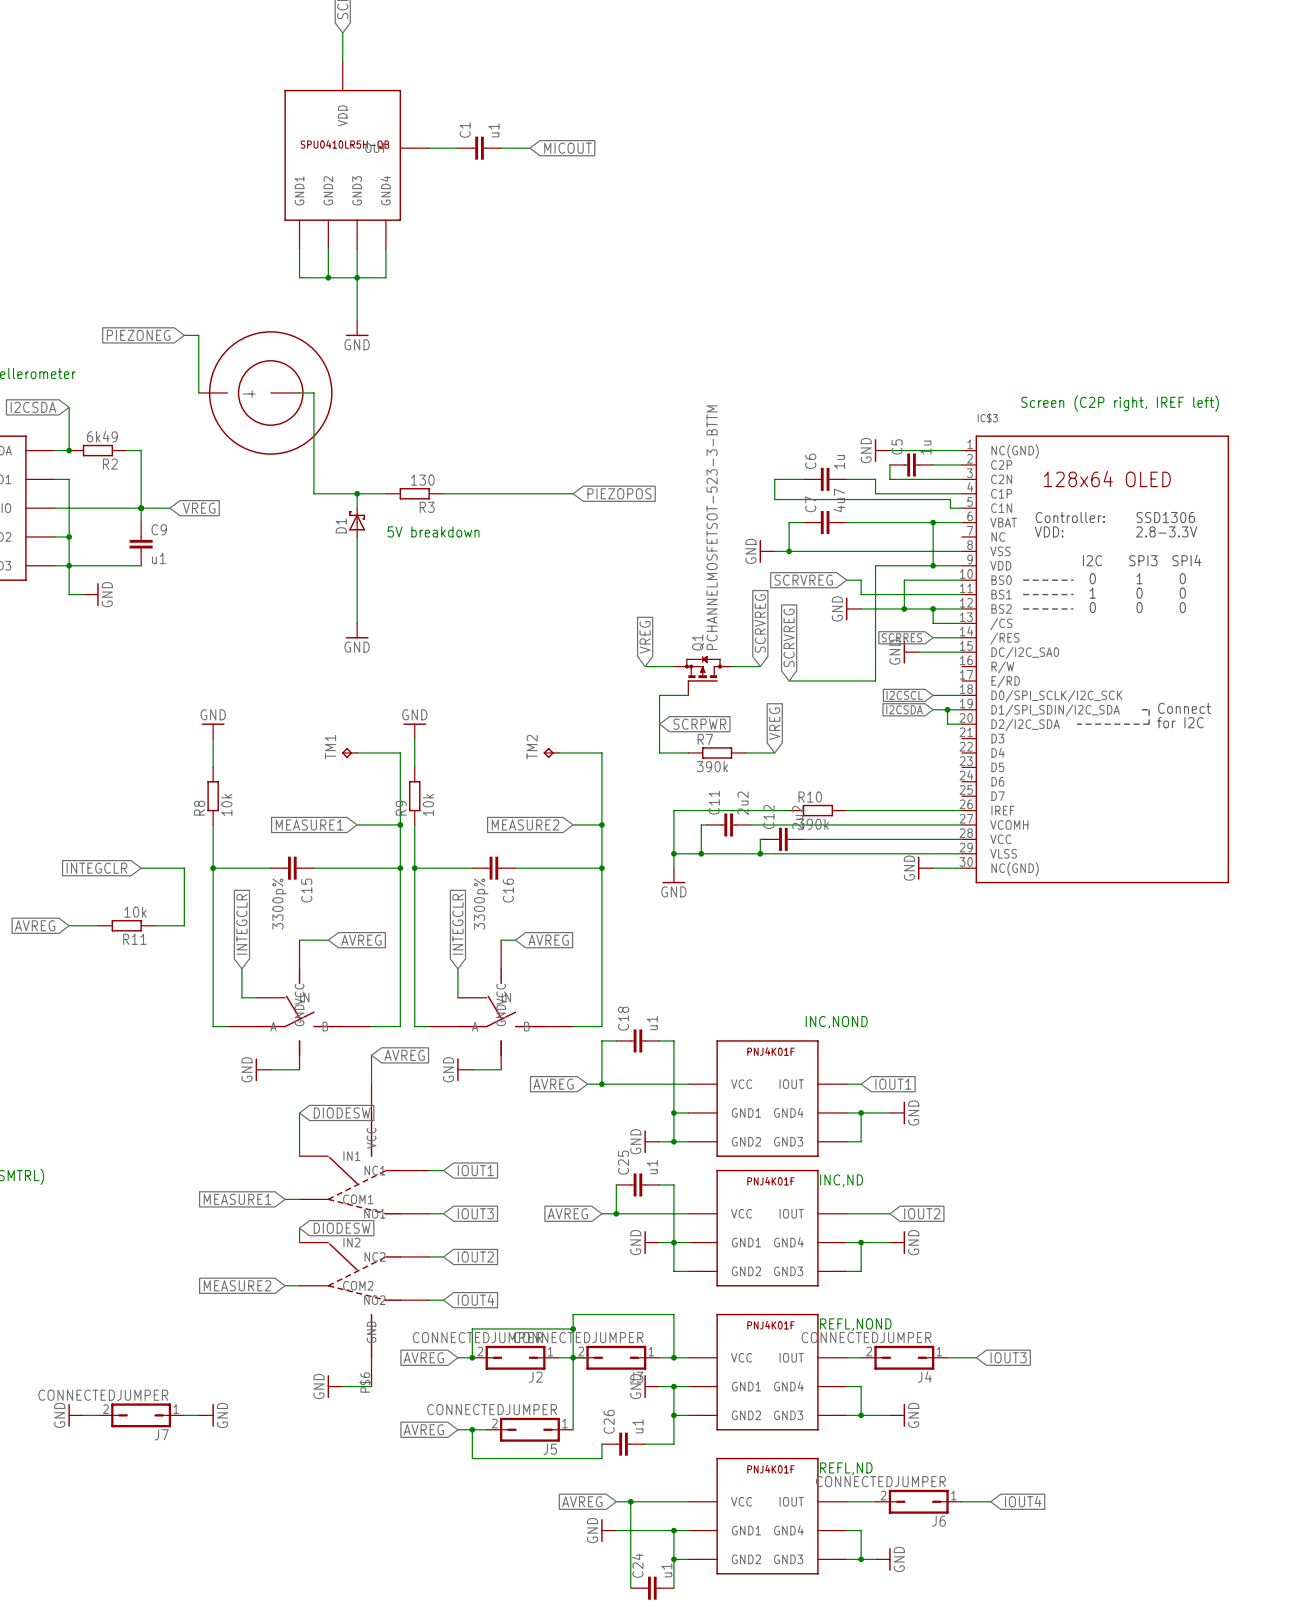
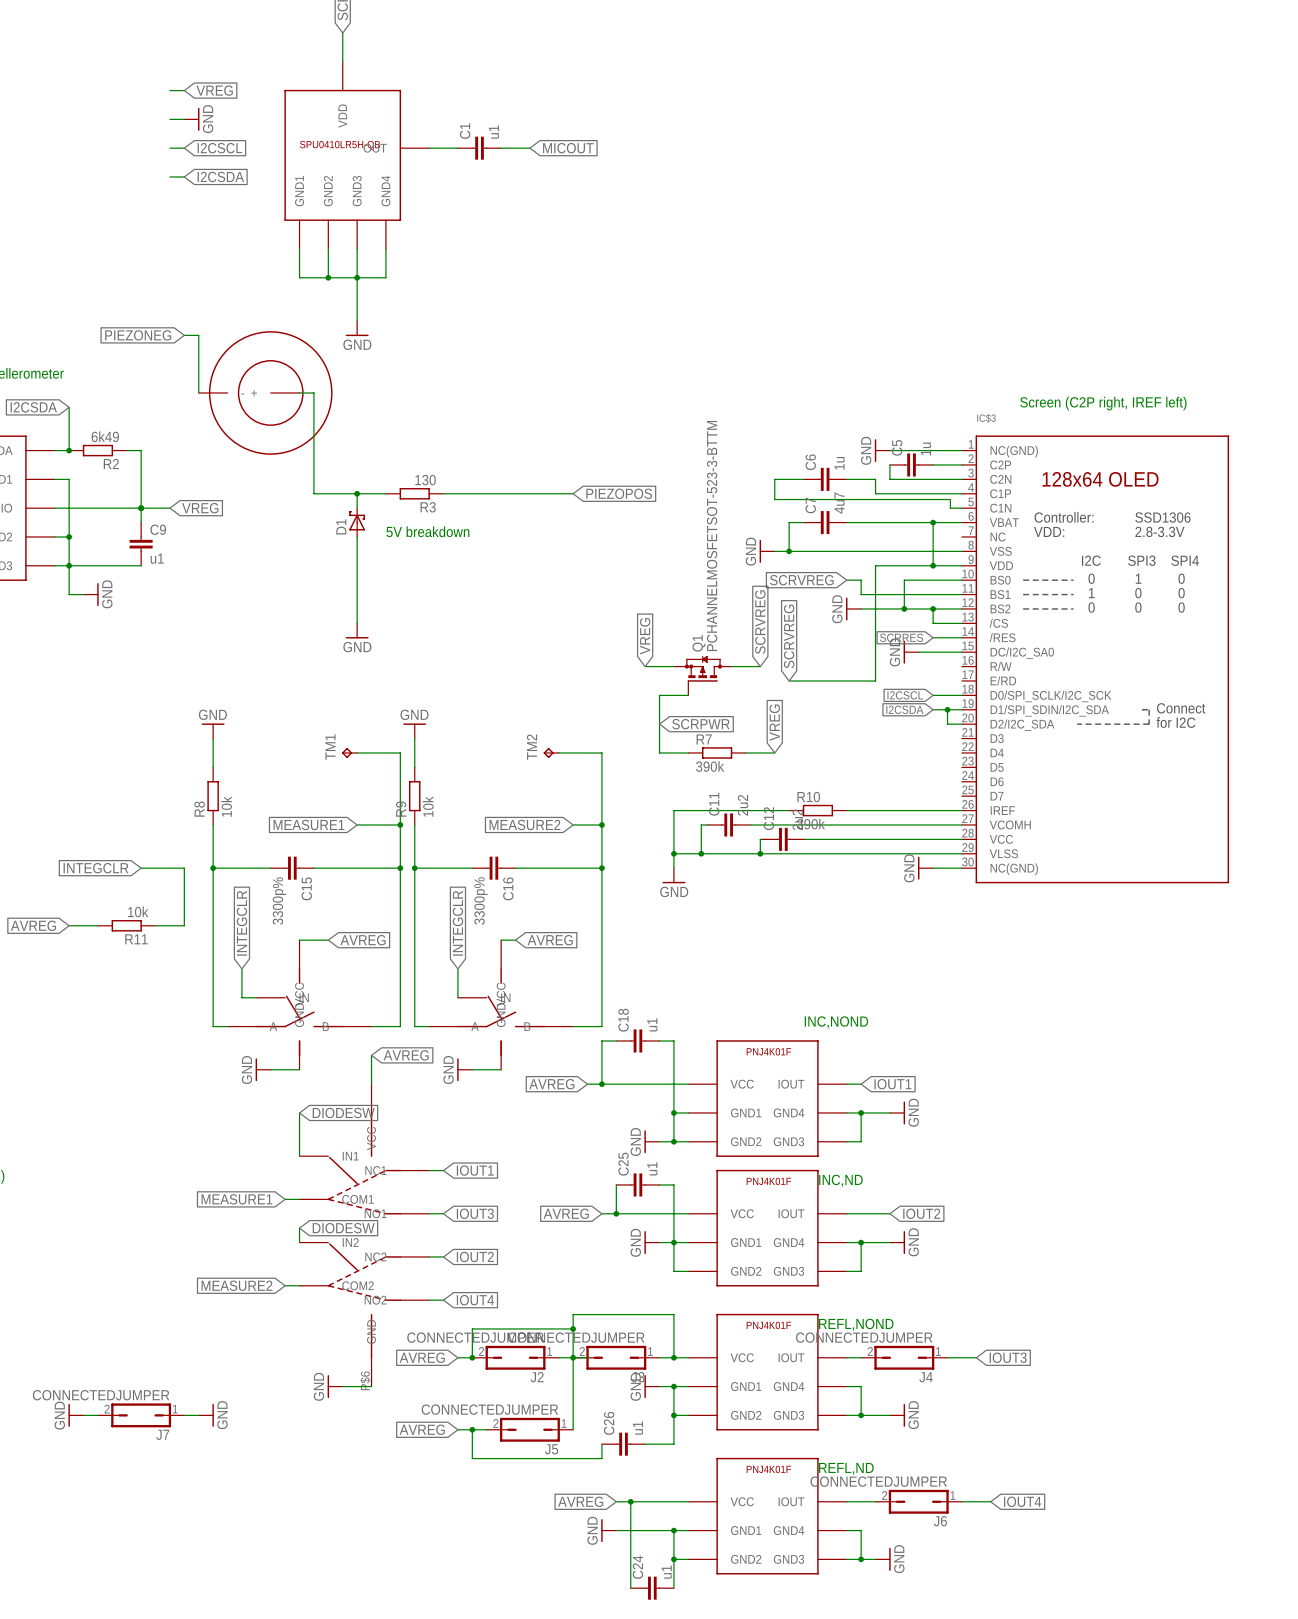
wire: none -> (169, 90) (184, 90)
global label: none -> VREG (214, 90)
wire: none -> (169, 119) (184, 119)
power symbol: none -> GND (191, 119)
wire: none -> (169, 148) (184, 148)
global label: none -> I2CSCL (219, 148)
wire: none -> (169, 176) (184, 176)
global label: none -> I2CSDA (220, 176)

